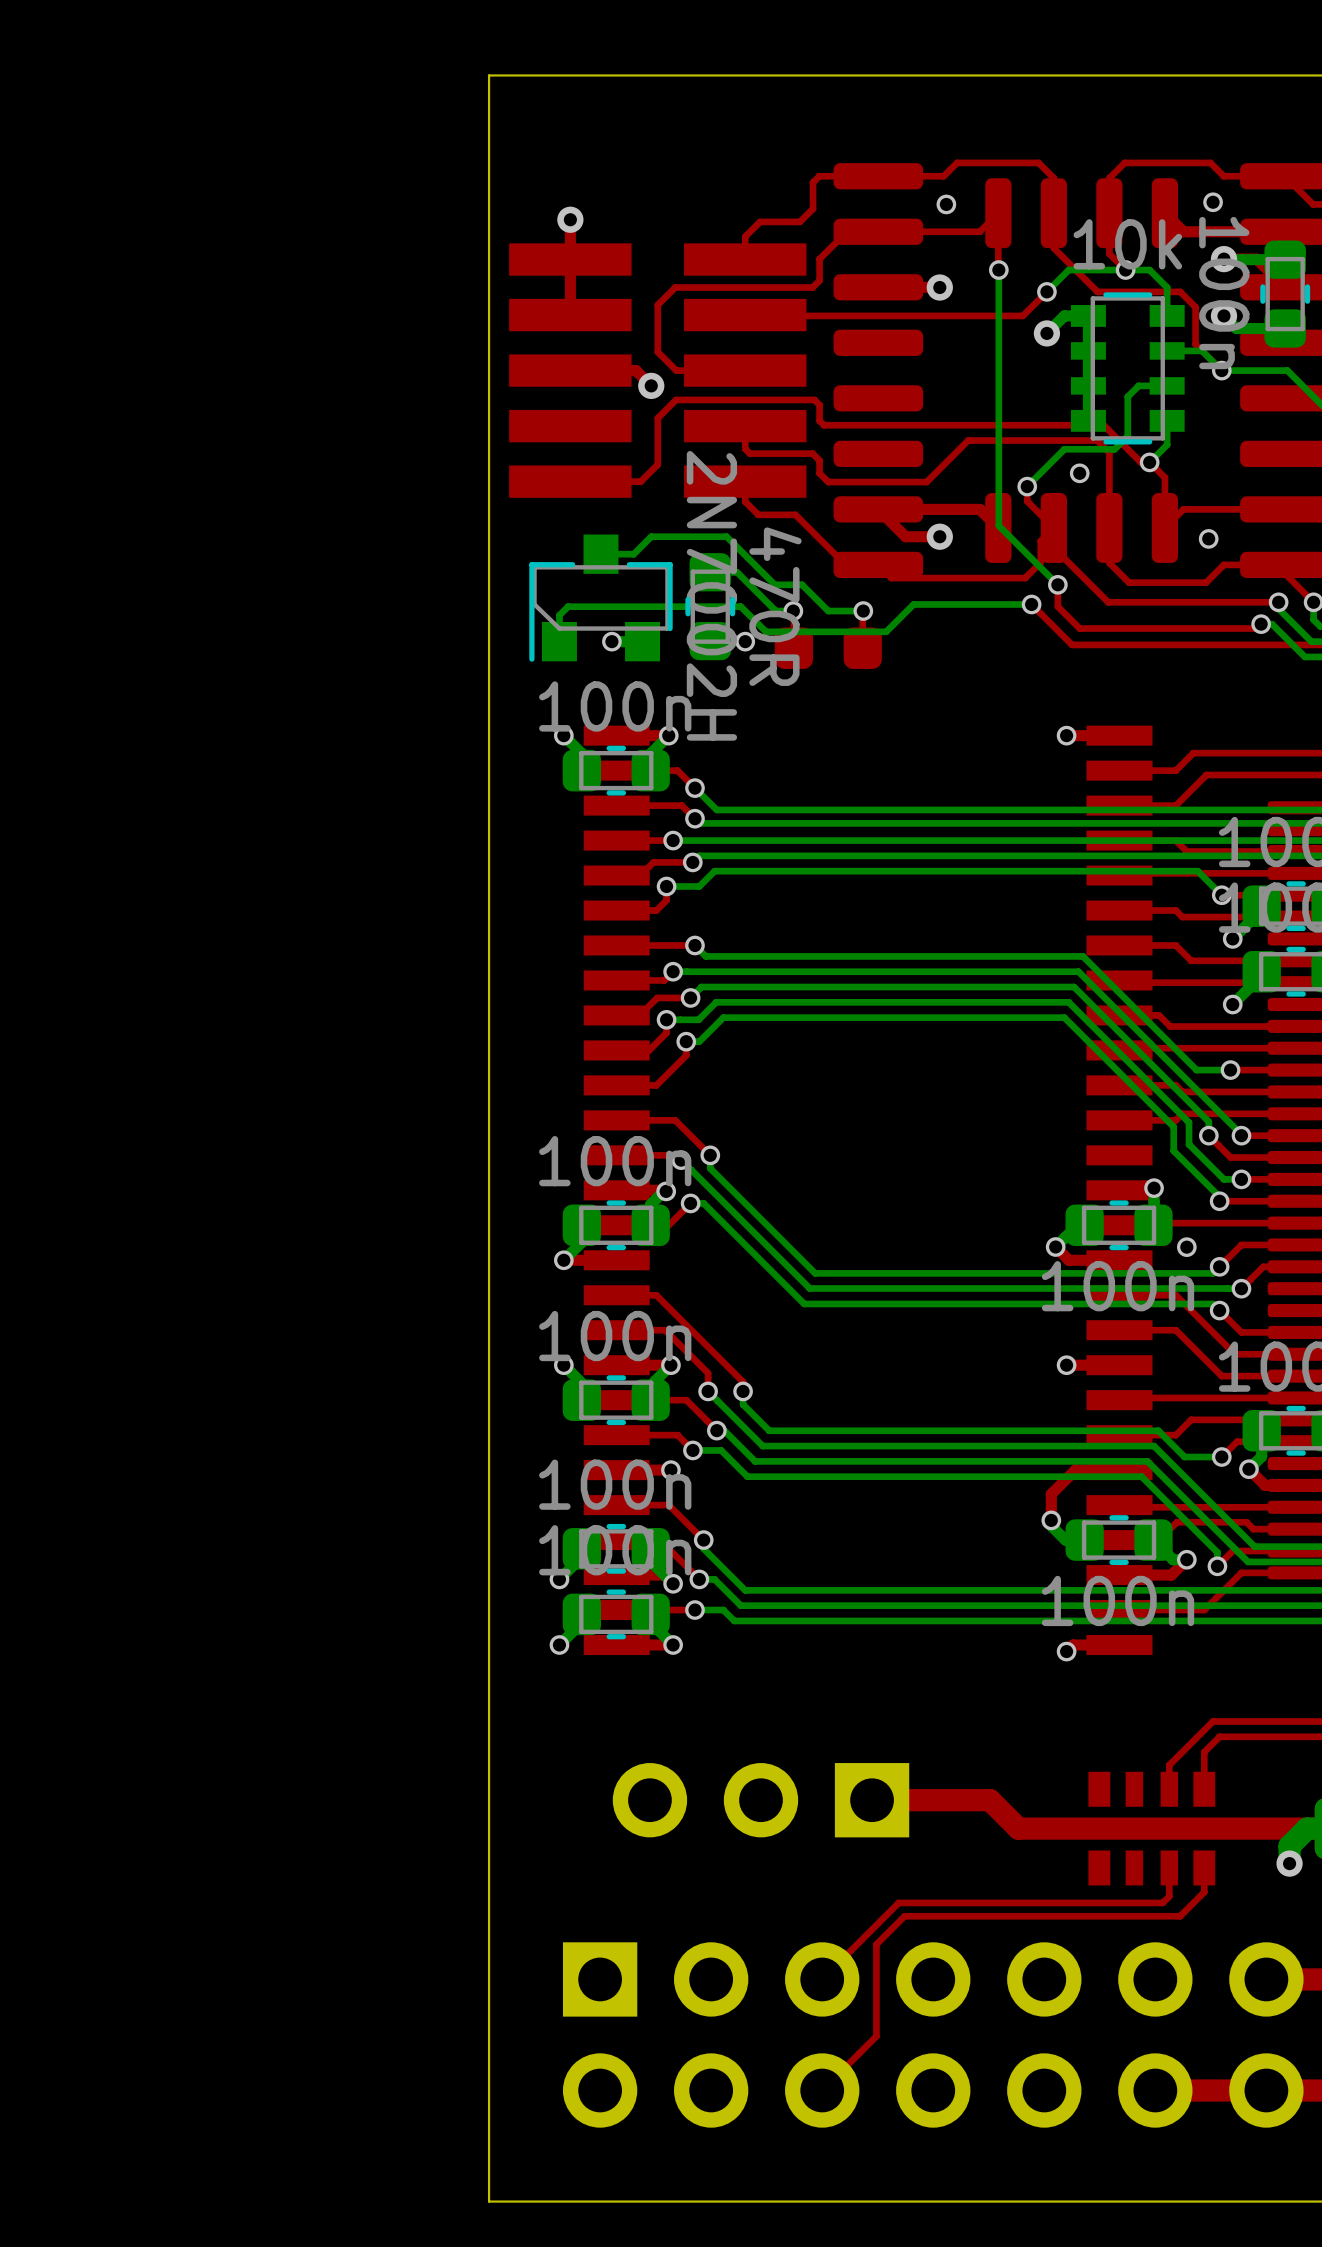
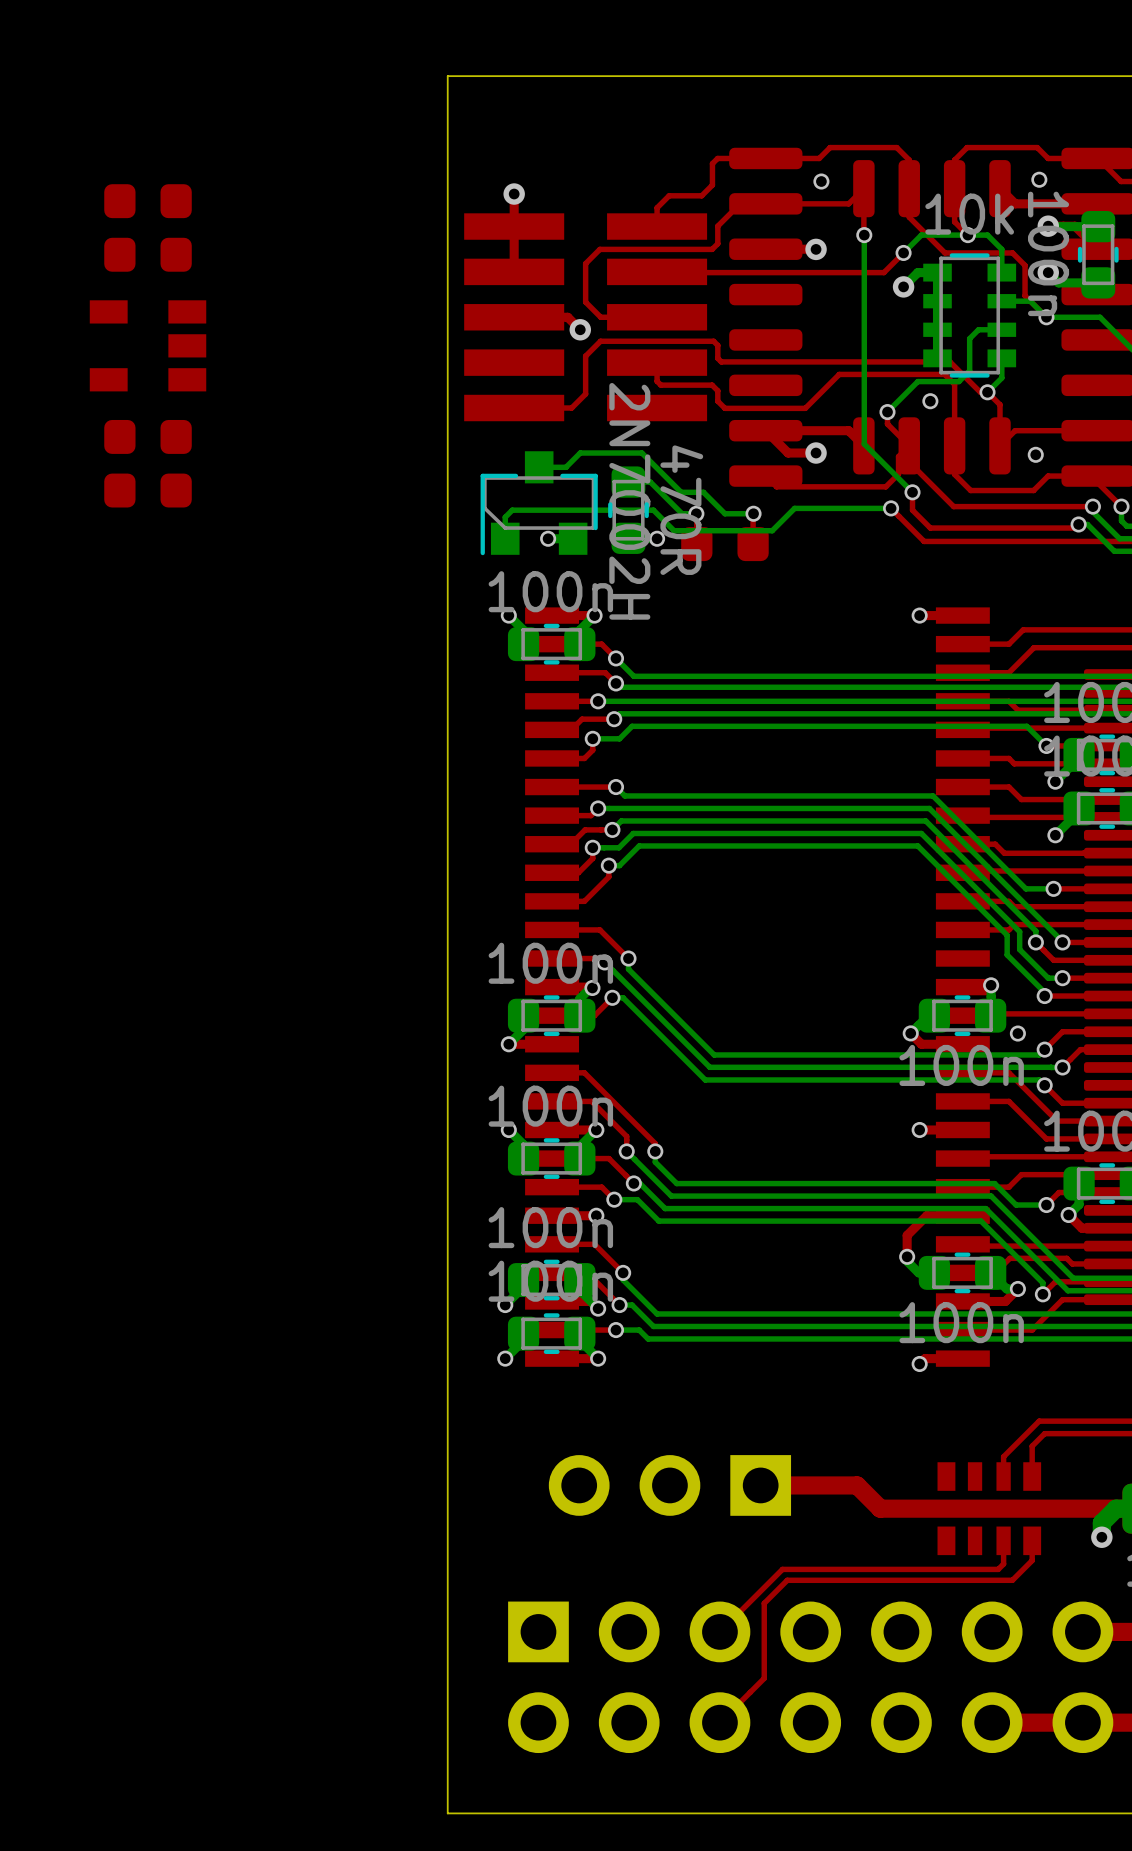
part: none -> (148, 201)
part: none -> (148, 254)
part: none -> (148, 345)
top track: (745, 481) (745, 501) (758, 514) (795, 514) (845, 564) (859, 564) -> none
part: none -> (148, 436)
part: none -> (148, 490)

